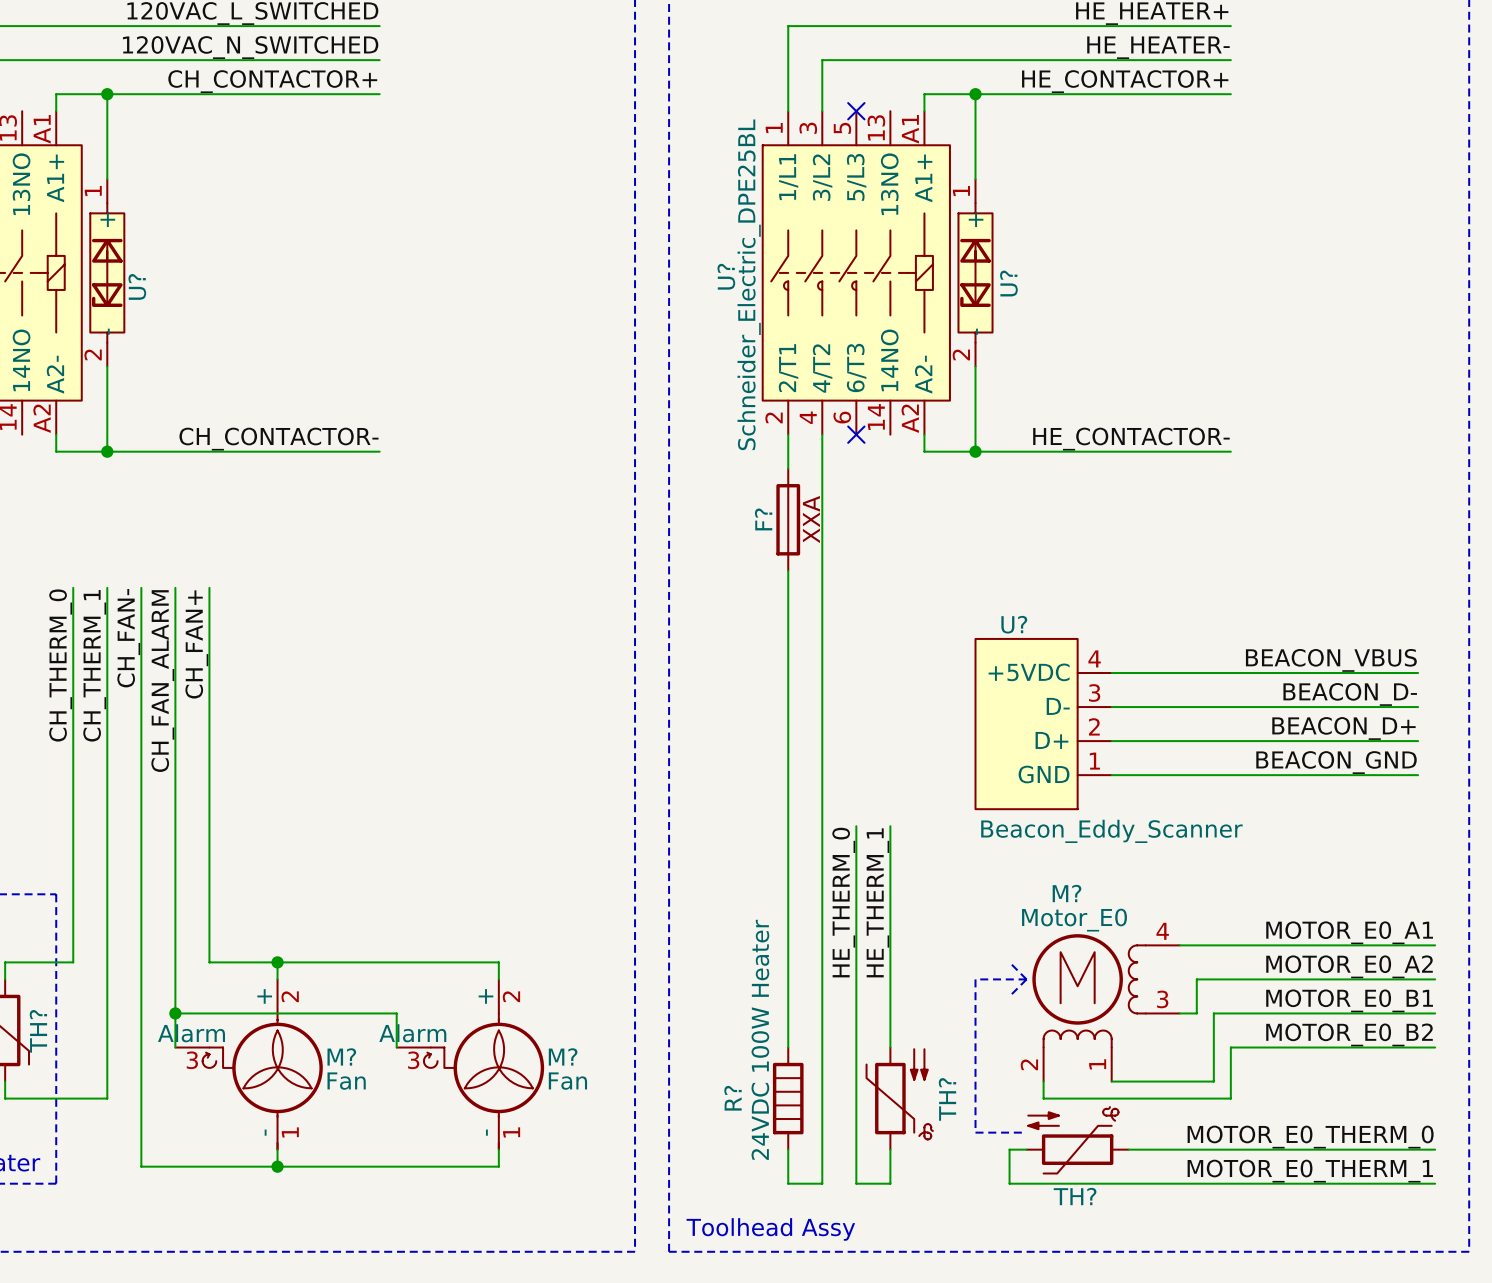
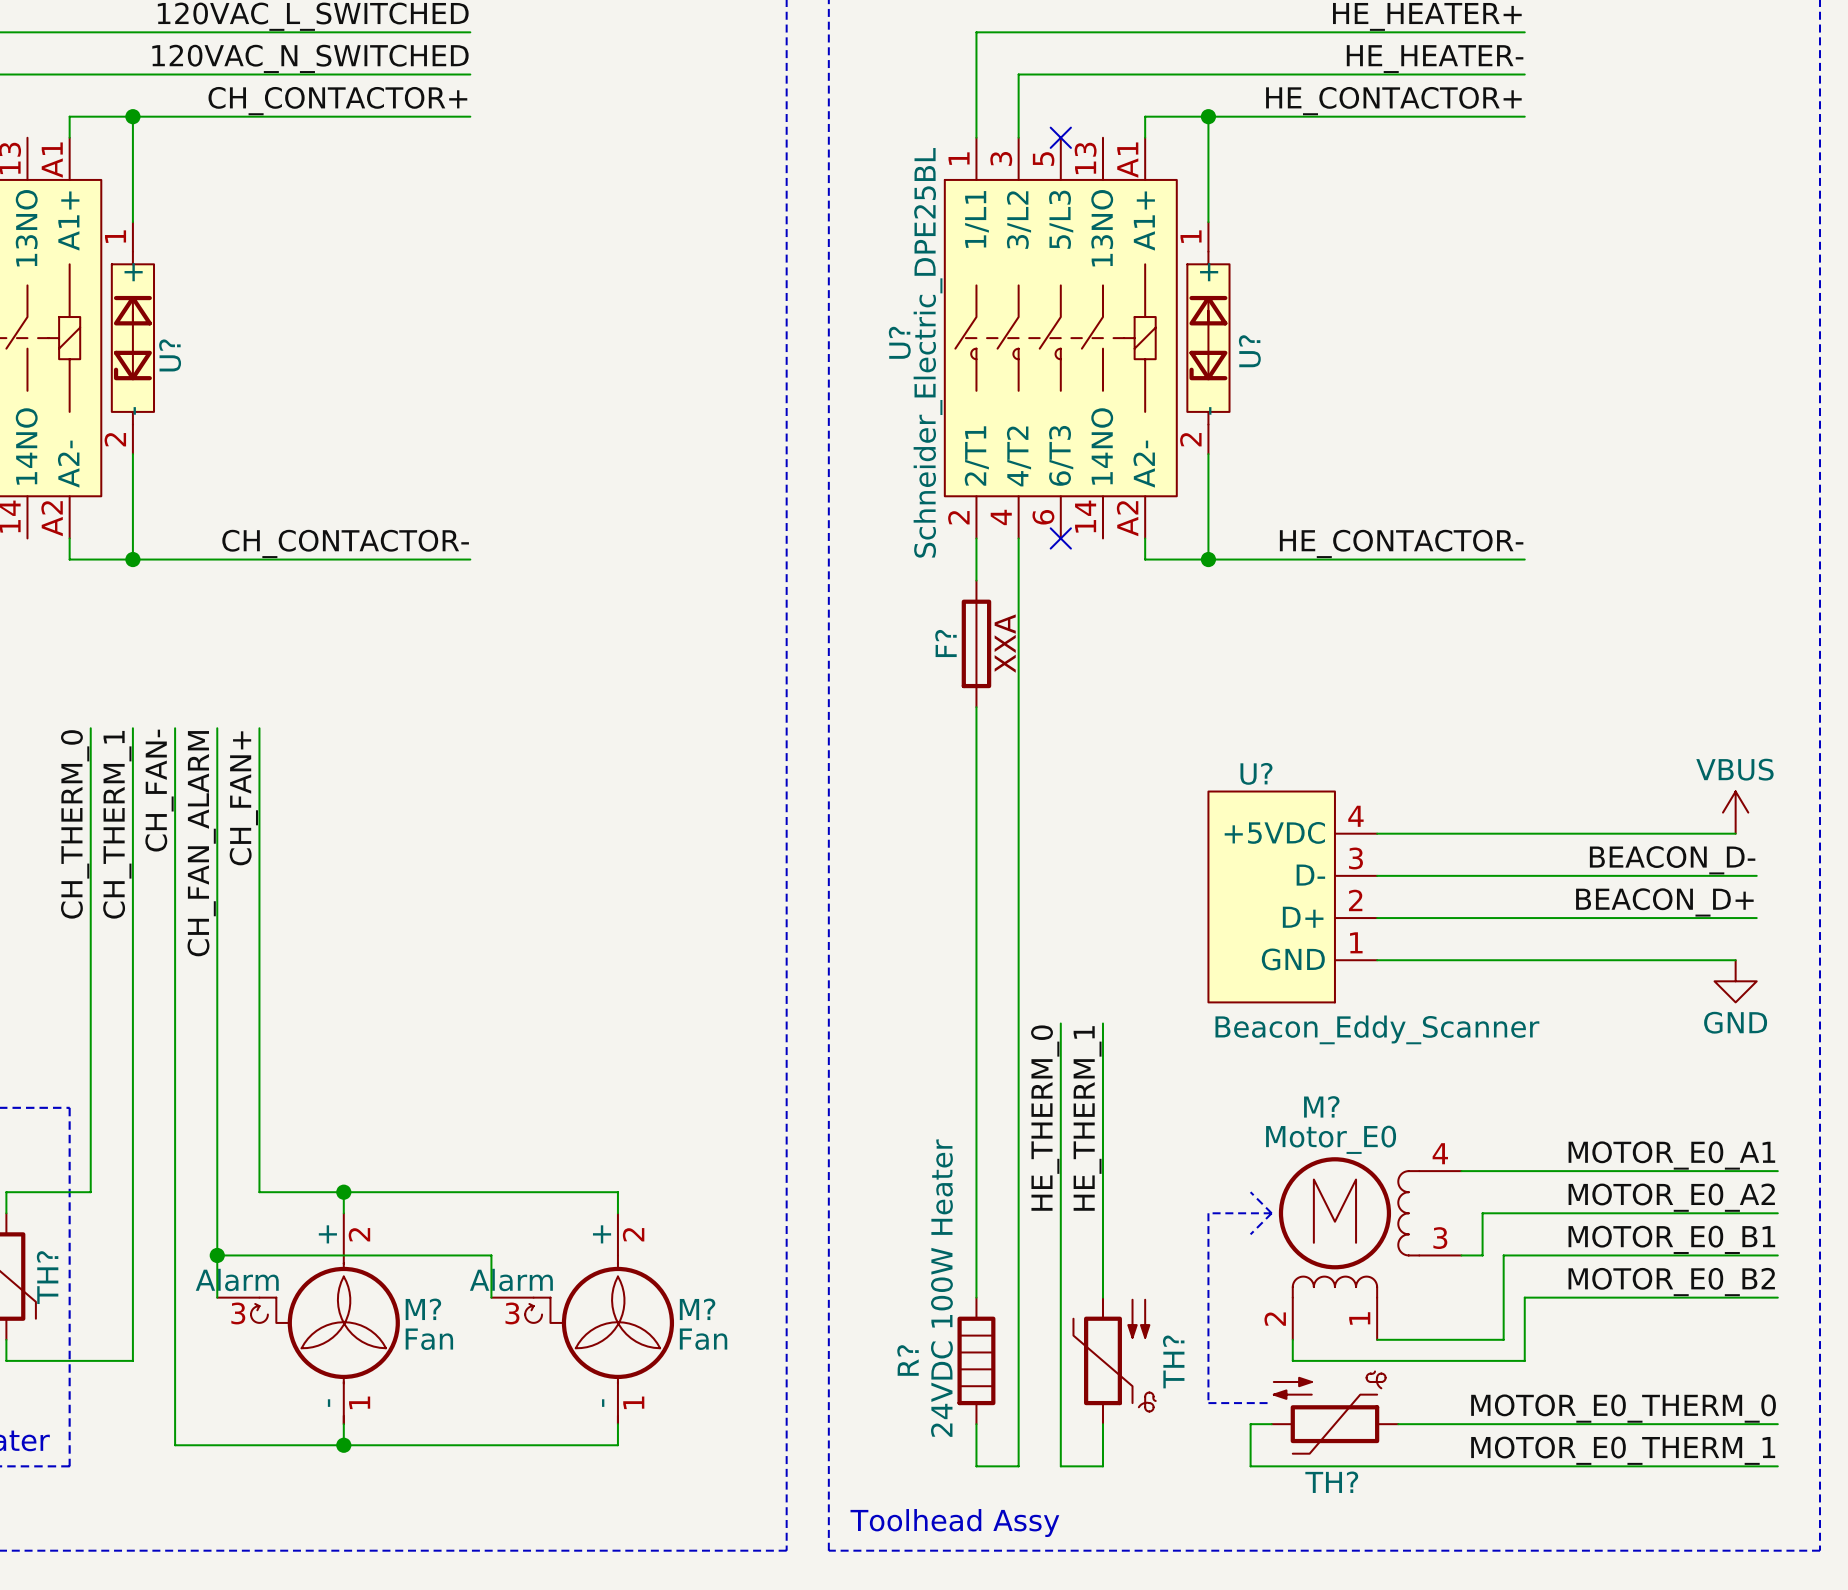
power symbol: none -> VBUS (1735, 812)
label: BEACON_VBUS (1331, 660) -> none
wire: (1401, 672) (1418, 672) -> none
label: BEACON_GND (1336, 762) -> none
wire: (1401, 775) (1418, 775) -> none
power symbol: none -> GND (1735, 981)

